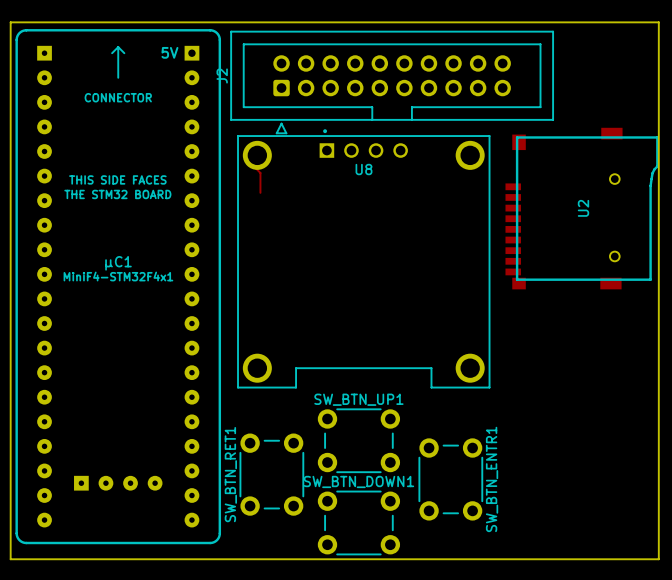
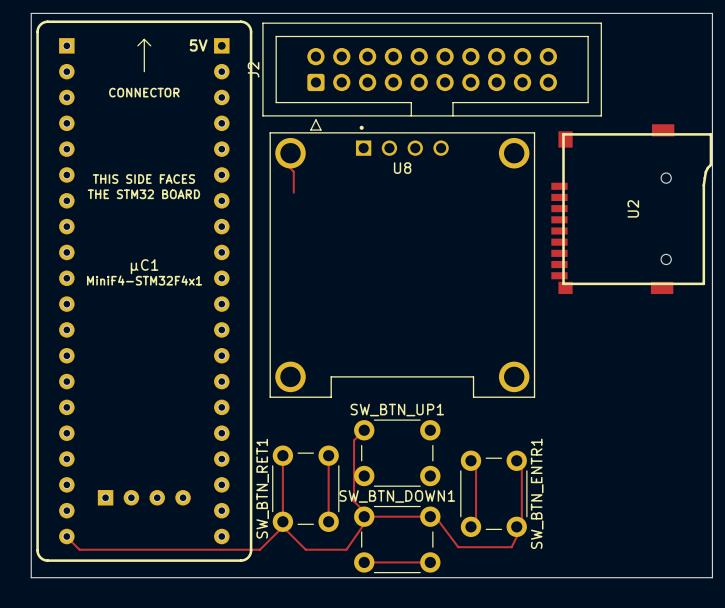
track: none -> (369, 425) (354, 440) (354, 501) (369, 516)
track: none -> (282, 460) (282, 526)
track: none -> (328, 460) (328, 526)
track: none -> (476, 460) (476, 526)
track: none -> (521, 460) (521, 526) (511, 547) (458, 547) (435, 516) (369, 516)
track: none -> (369, 516) (346, 549) (305, 549) (282, 526)
track: none -> (282, 526) (260, 549) (79, 549) (66, 537)
track: none -> (369, 562) (435, 562)

